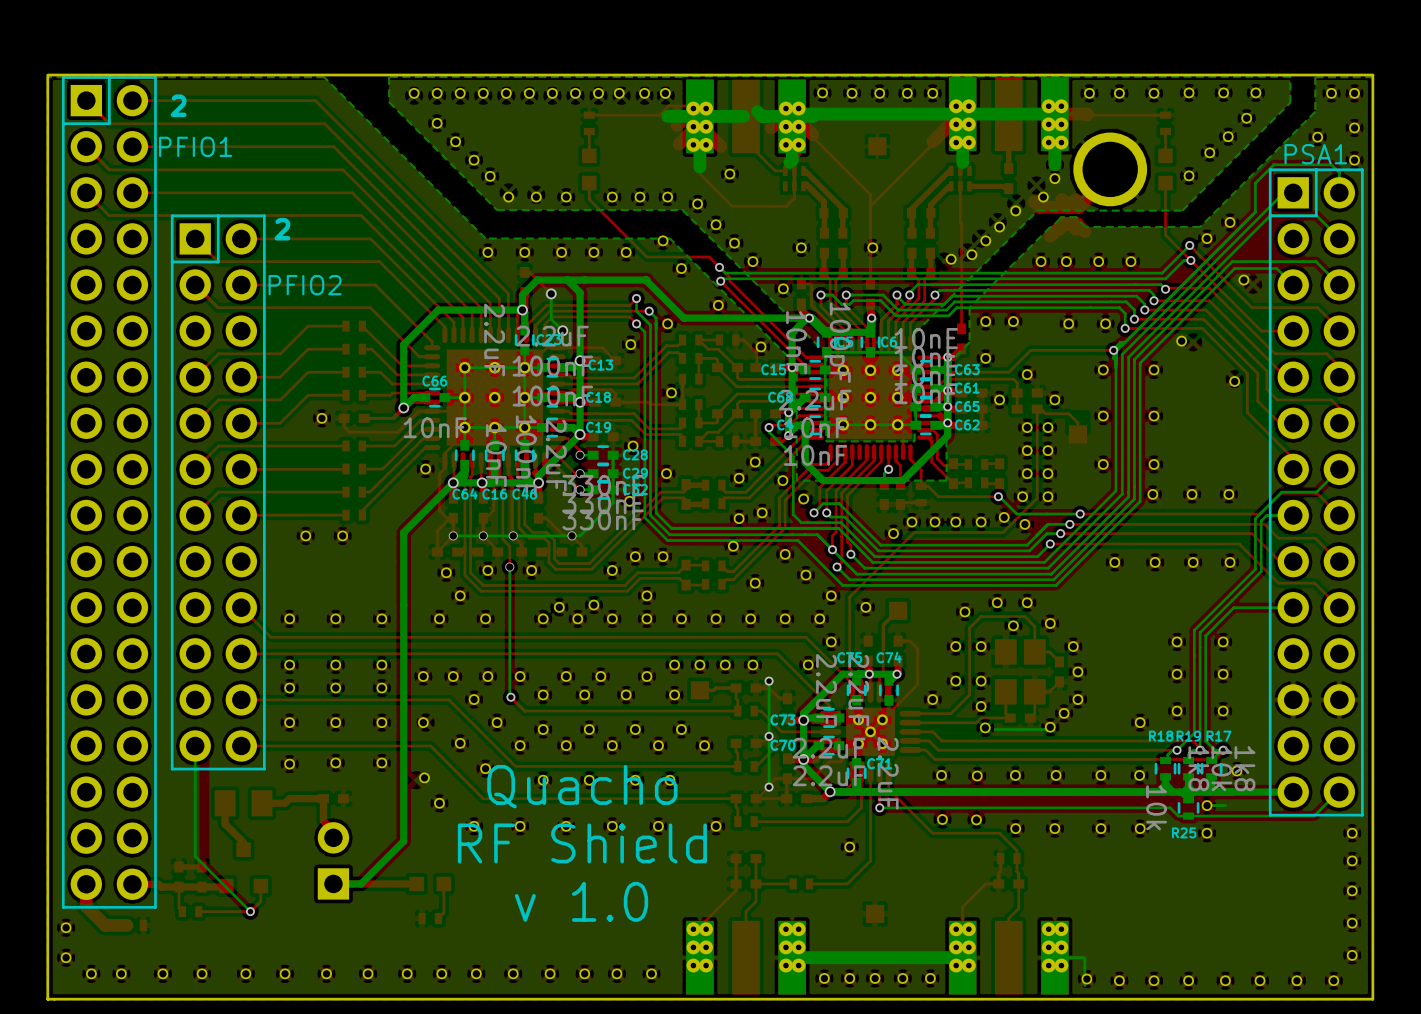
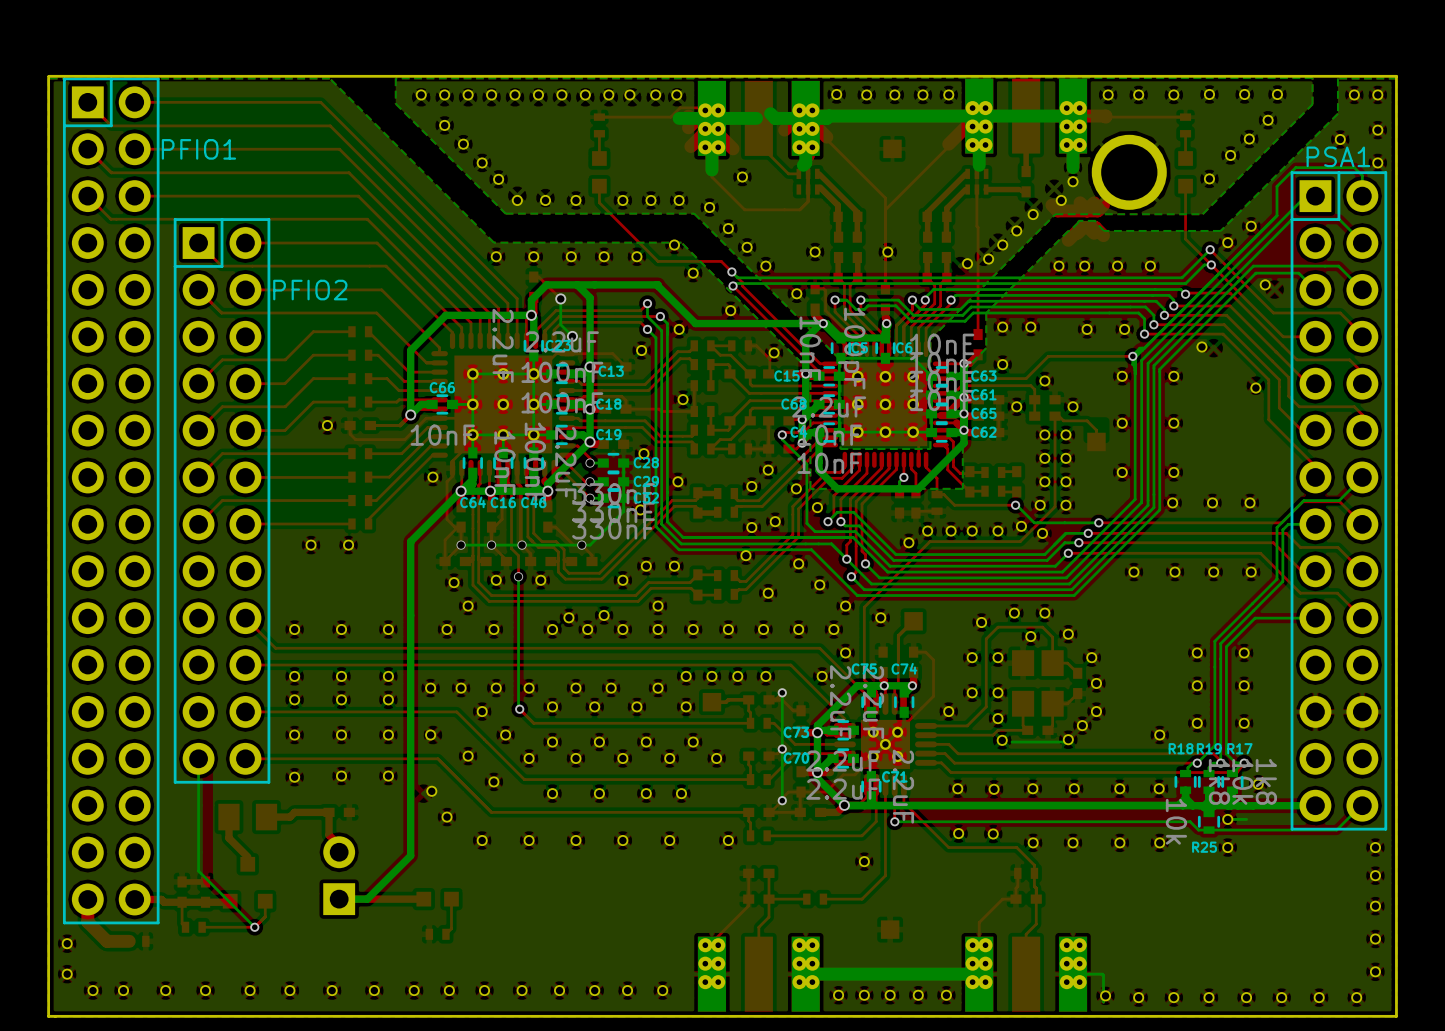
text: 2 (178, 105) -> none
text: 2 (282, 229) -> none
text: Quacho (582, 786) -> none
text: RF Shield (582, 843) -> none
text: v 1.0 (581, 901) -> none

